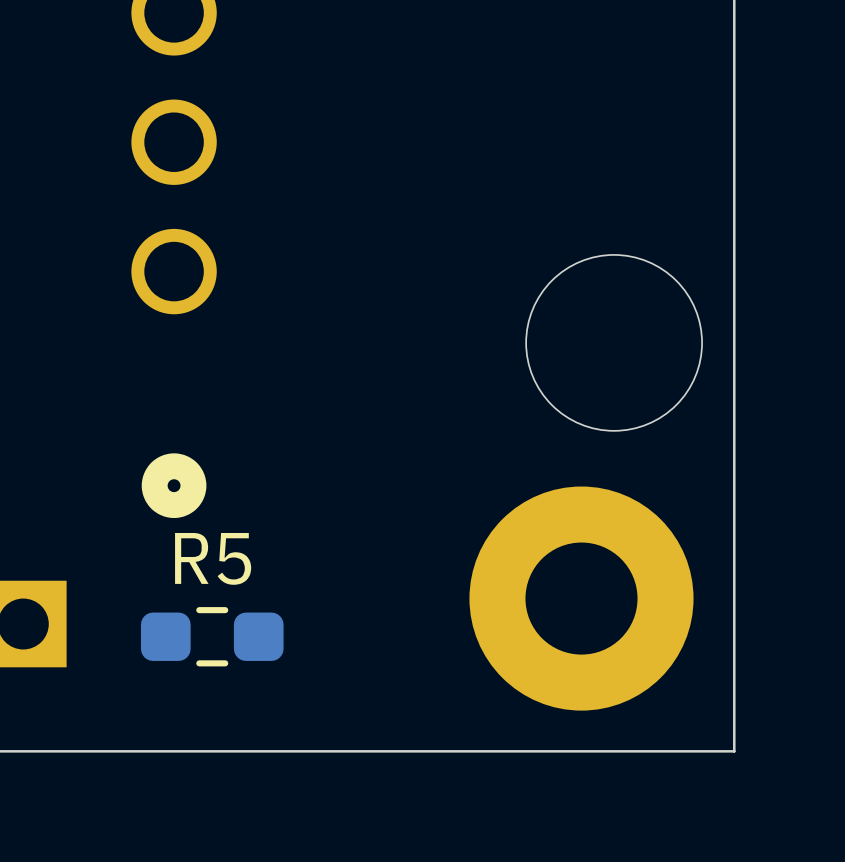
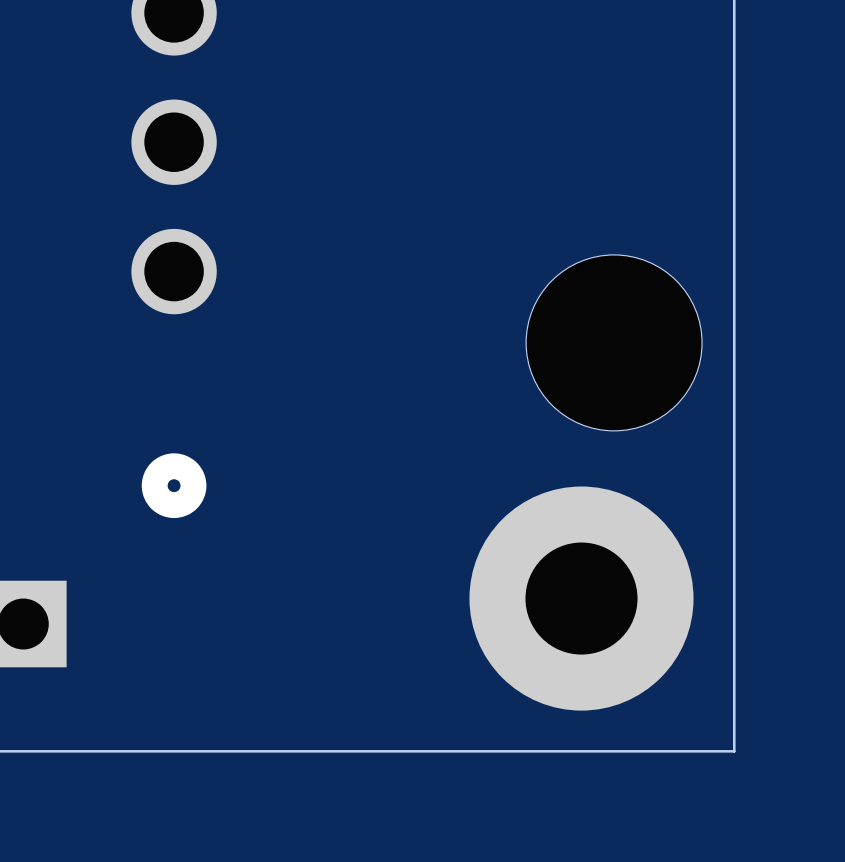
R5: (212, 636) -> none

